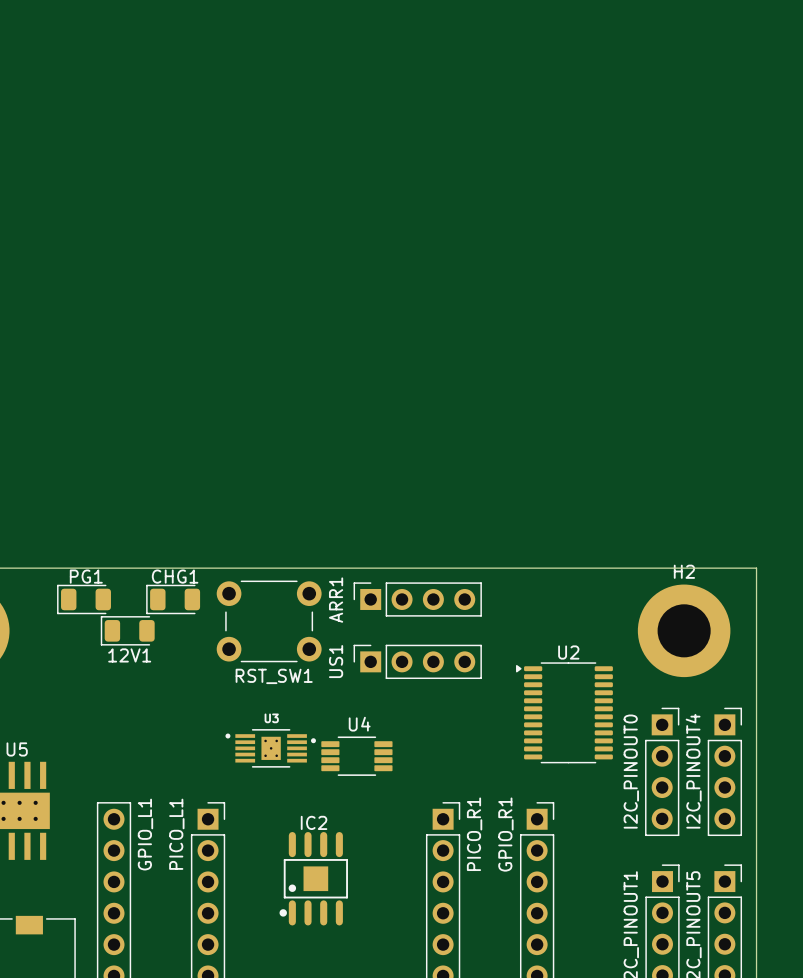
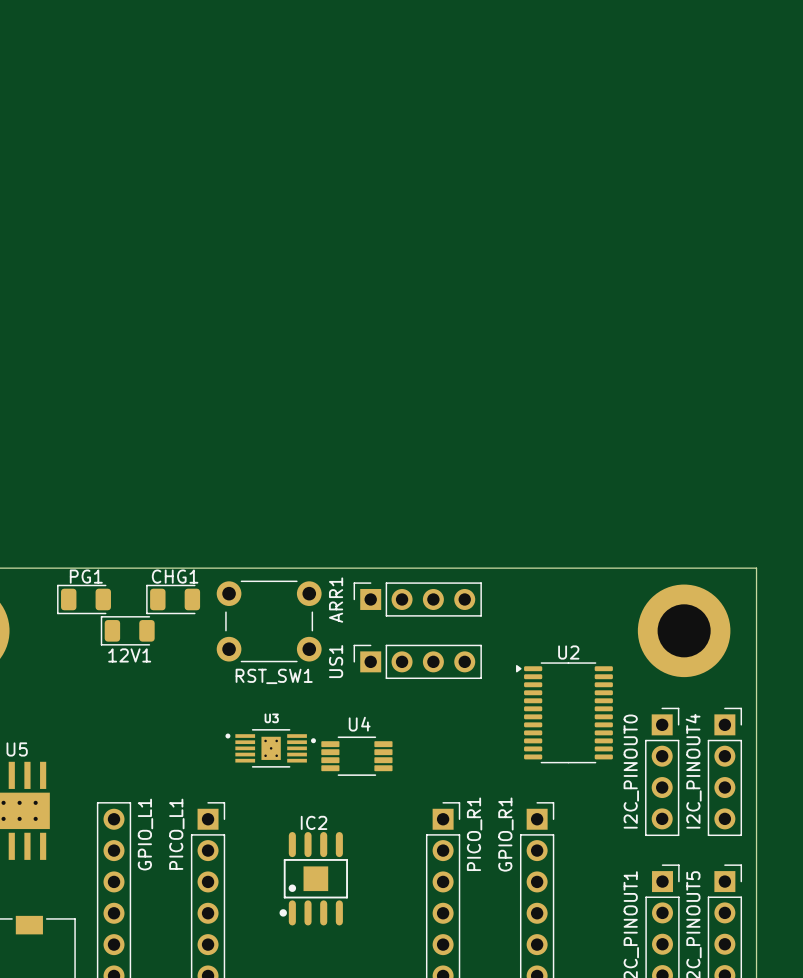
H2 name: H2 (684, 571) -> none

